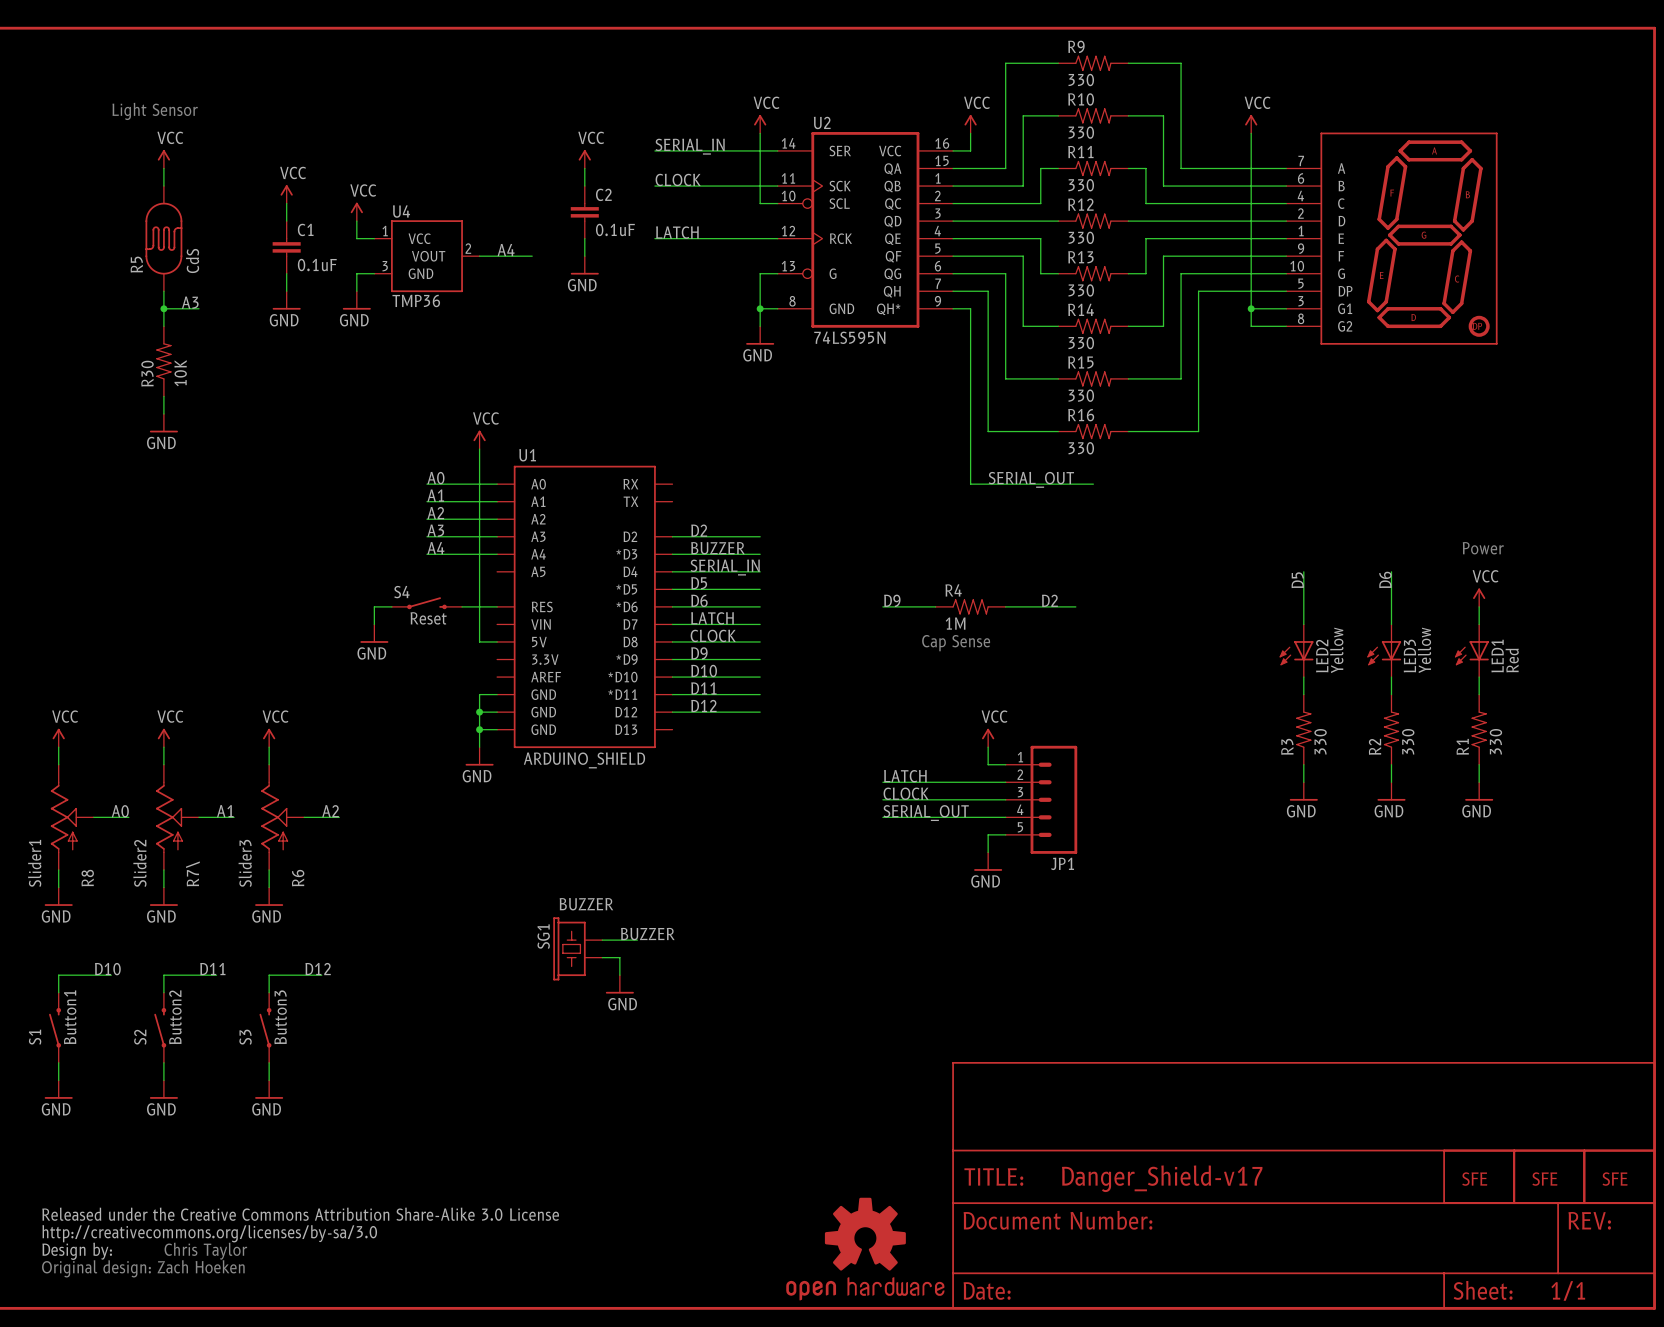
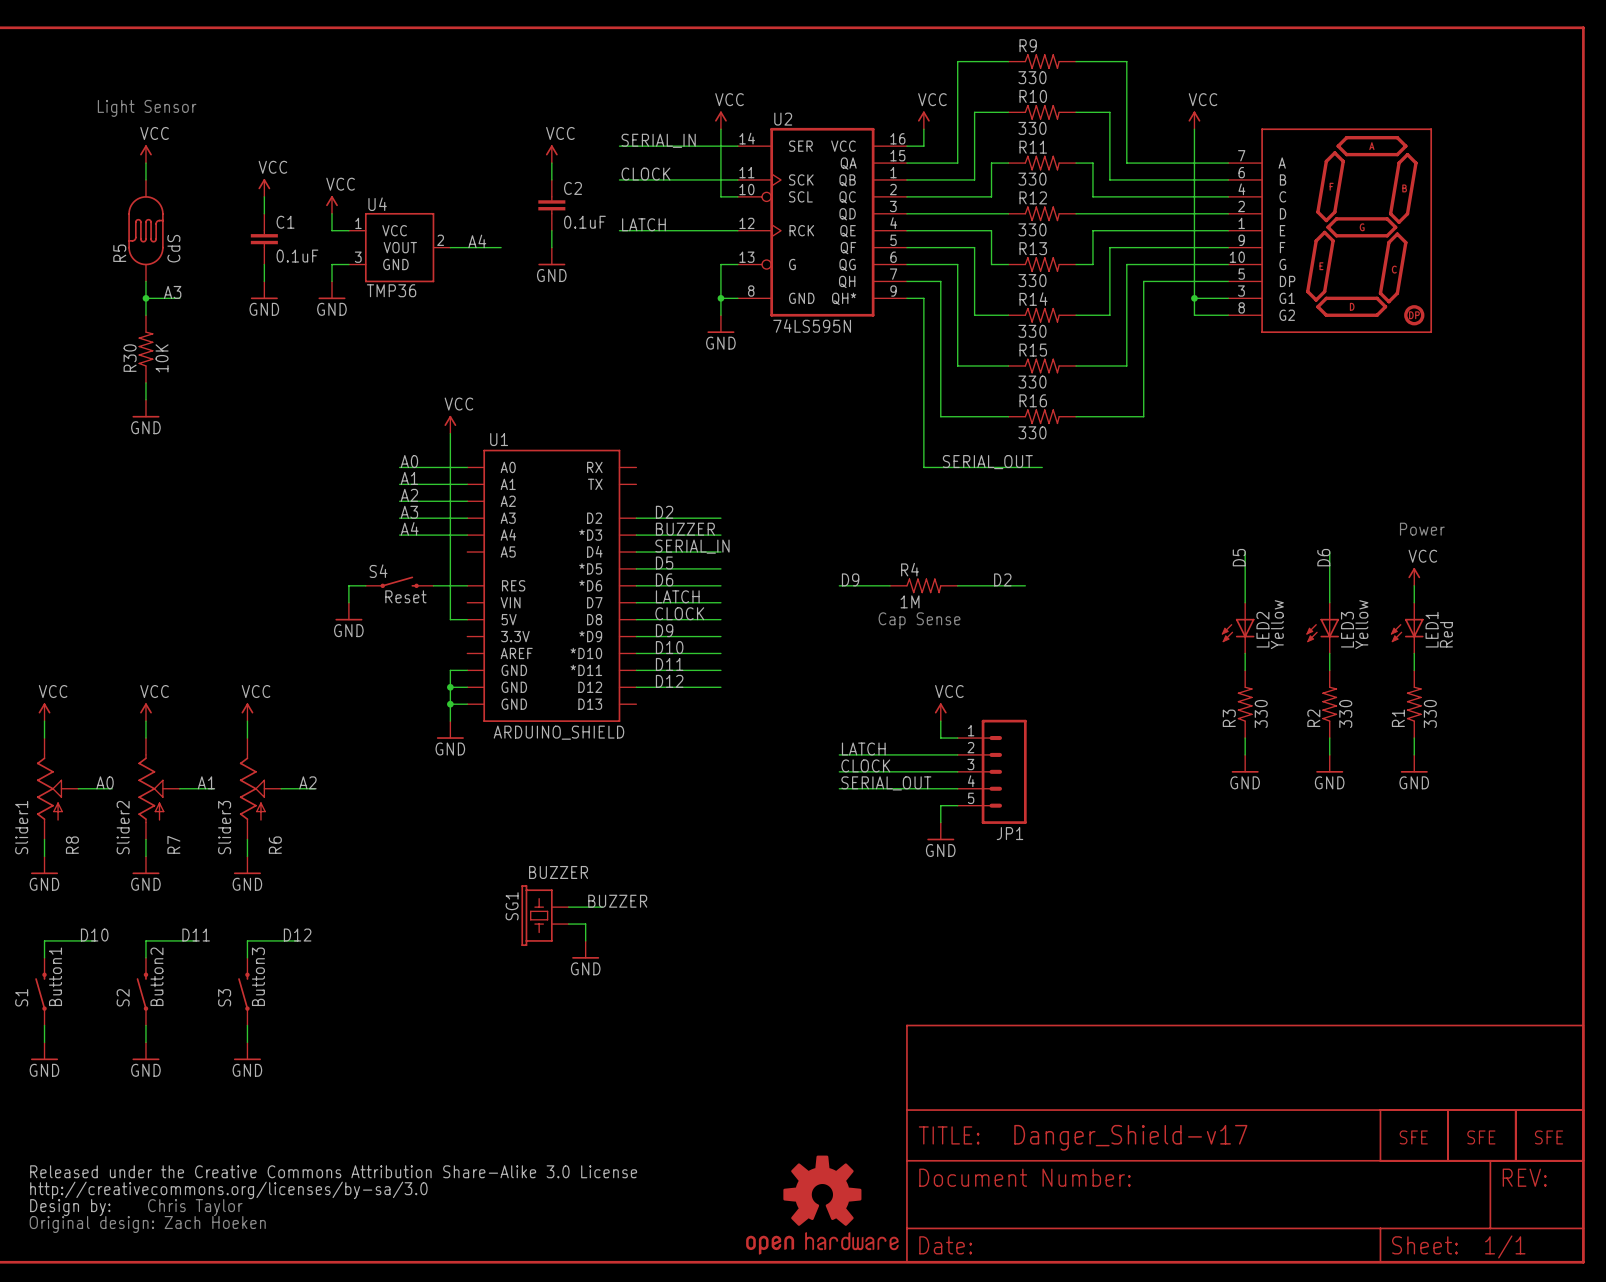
R7\ name: R7\ (192, 873) -> R7 (173, 844)

